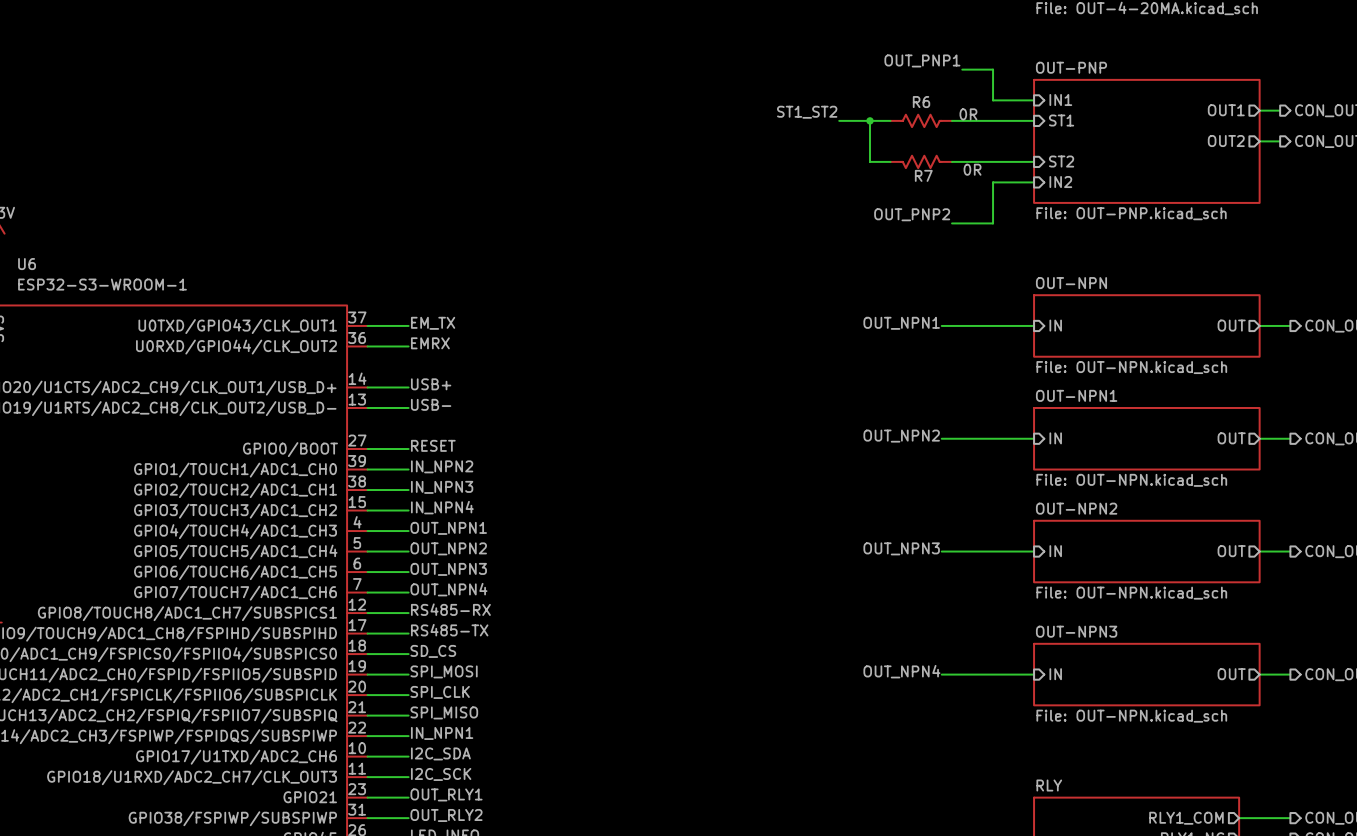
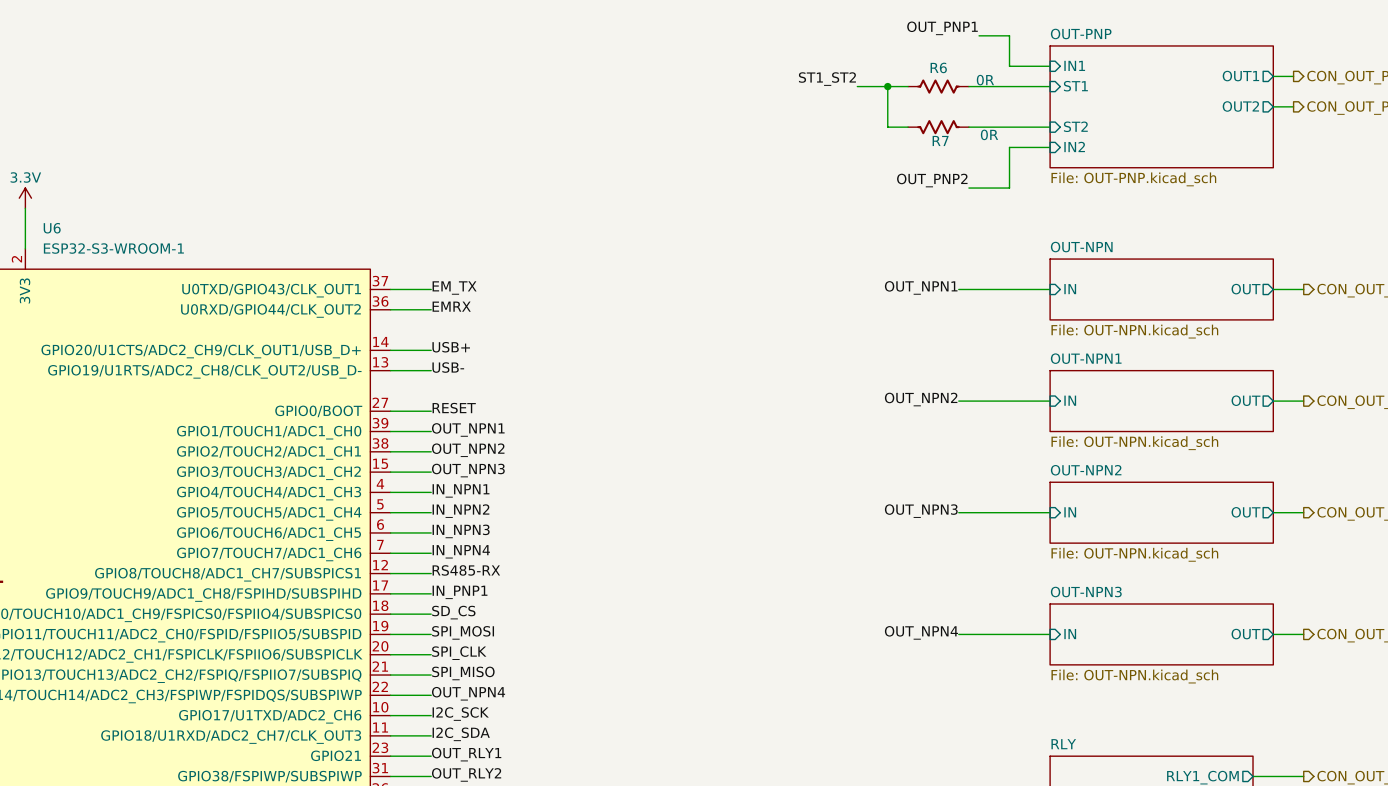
label: IN_NPN2 (442, 466) -> OUT_NPN1 (468, 429)
label: IN_NPN3 (442, 487) -> OUT_NPN2 (468, 450)
label: IN_NPN4 (442, 507) -> OUT_NPN3 (468, 470)
label: OUT_NPN1 (448, 528) -> IN_NPN1 (461, 490)
label: OUT_NPN2 (448, 548) -> IN_NPN2 (460, 511)
label: OUT_NPN3 (448, 569) -> IN_NPN3 (461, 531)
label: OUT_NPN4 (448, 589) -> IN_NPN4 (461, 551)
label: RS485-TX (449, 630) -> IN_PNP1 (460, 592)
label: IN_NPN1 (442, 733) -> OUT_NPN4 (468, 693)
label: I2C_SDA (440, 753) -> I2C_SCK (460, 714)
label: I2C_SCK (441, 774) -> I2C_SDA (461, 734)

